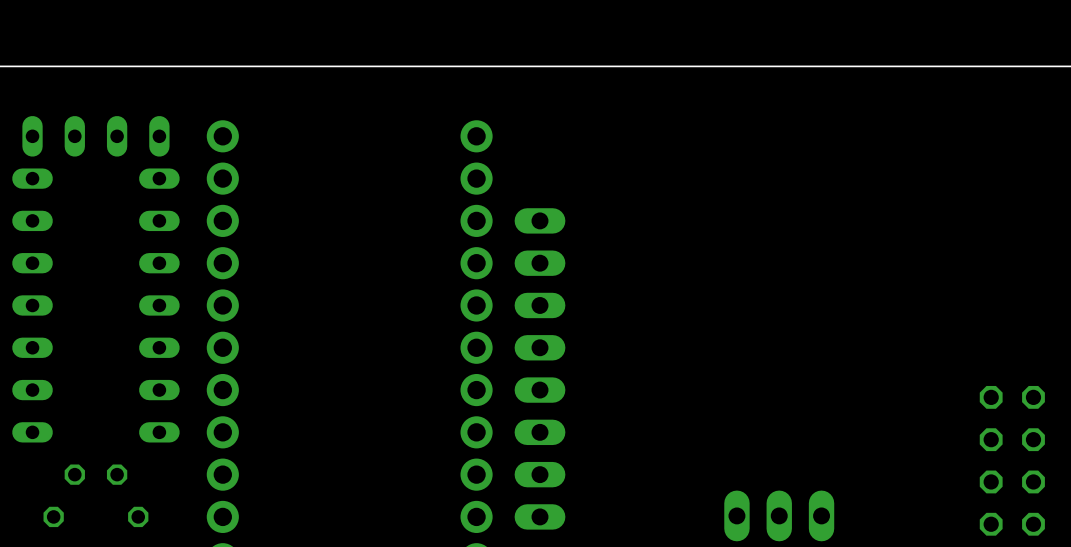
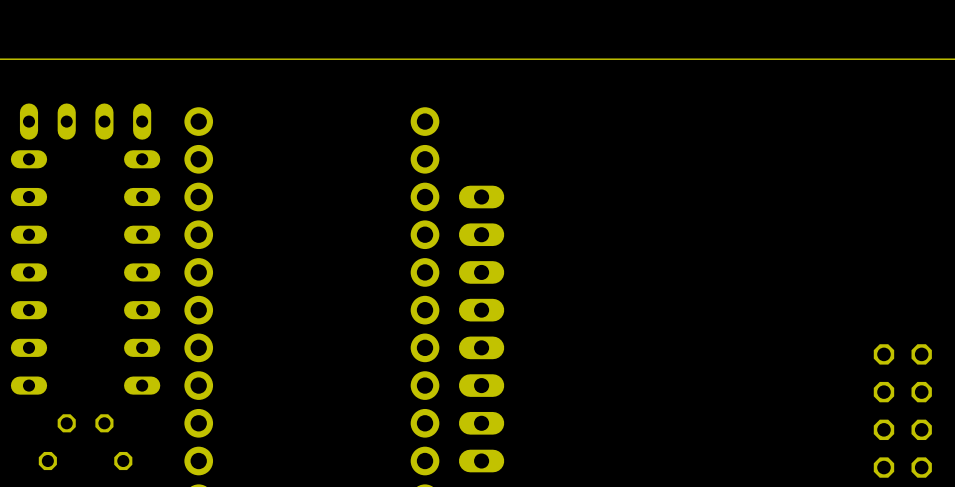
part: (779, 515) -> none

